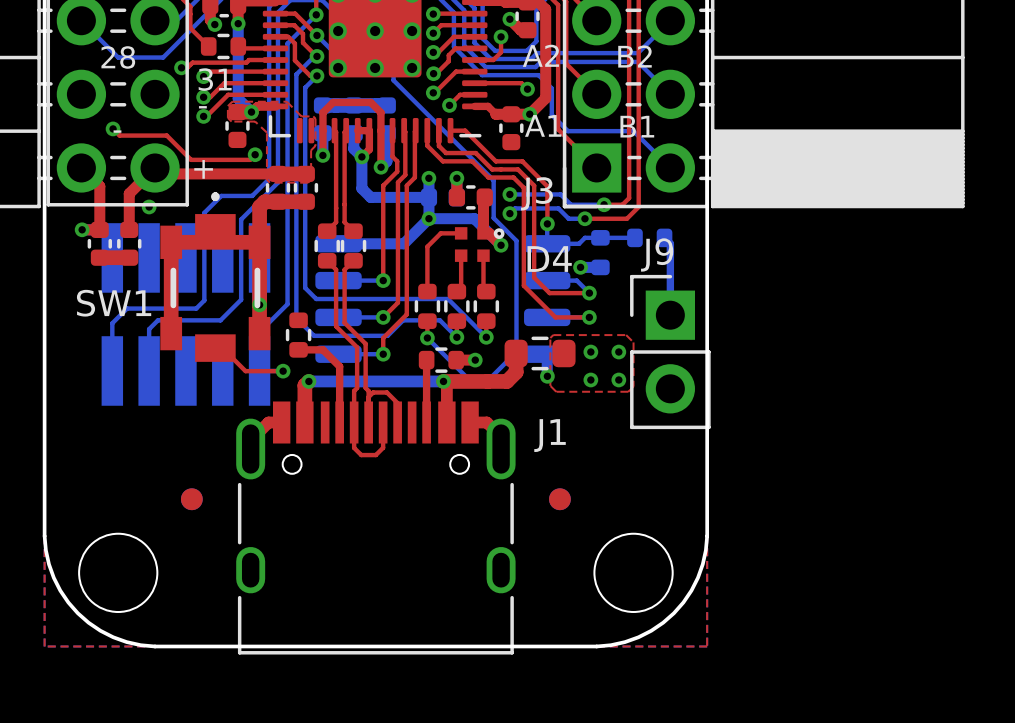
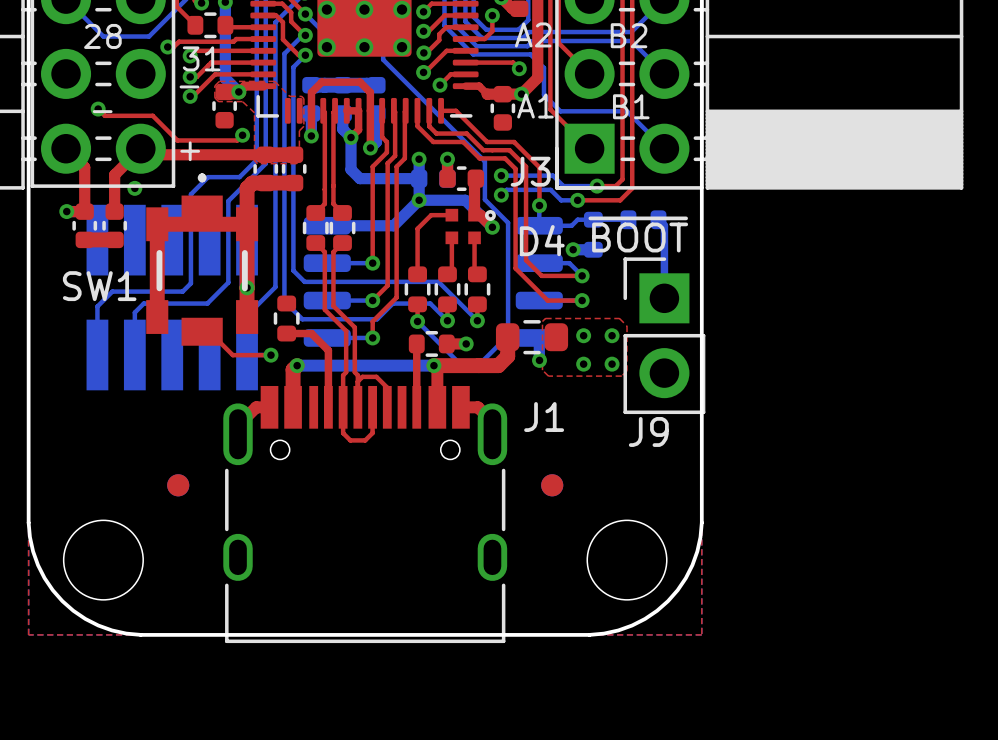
text: none -> ~{BOOT} (638, 234)
J9 name position: J9 (657, 254) -> J9 (648, 431)

